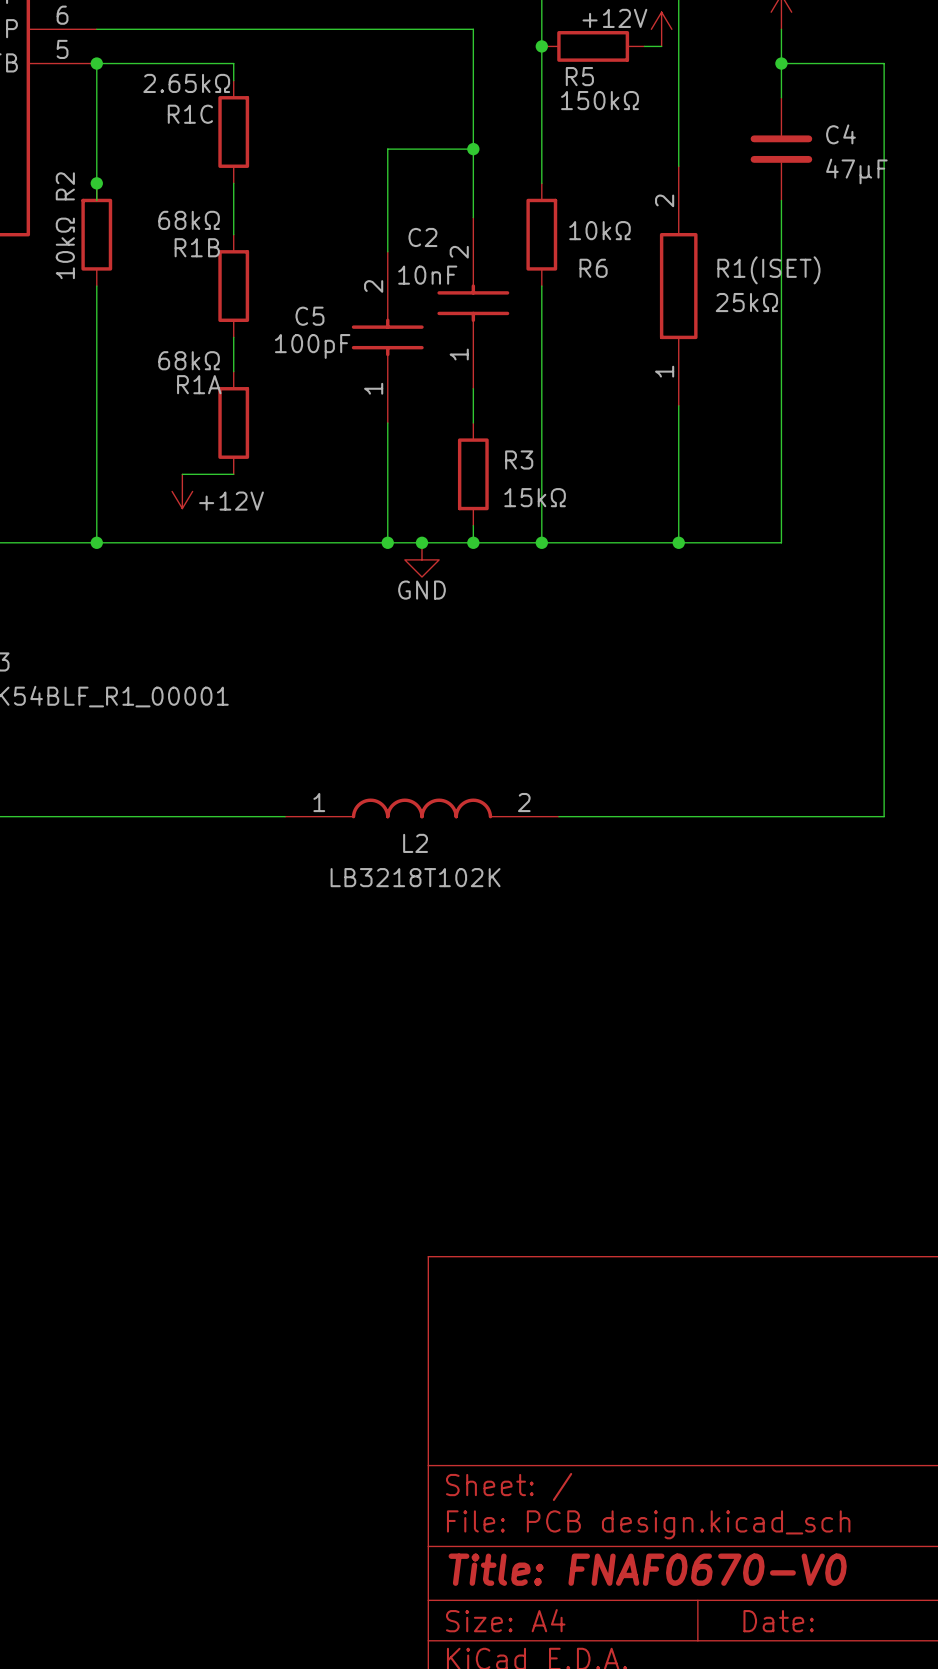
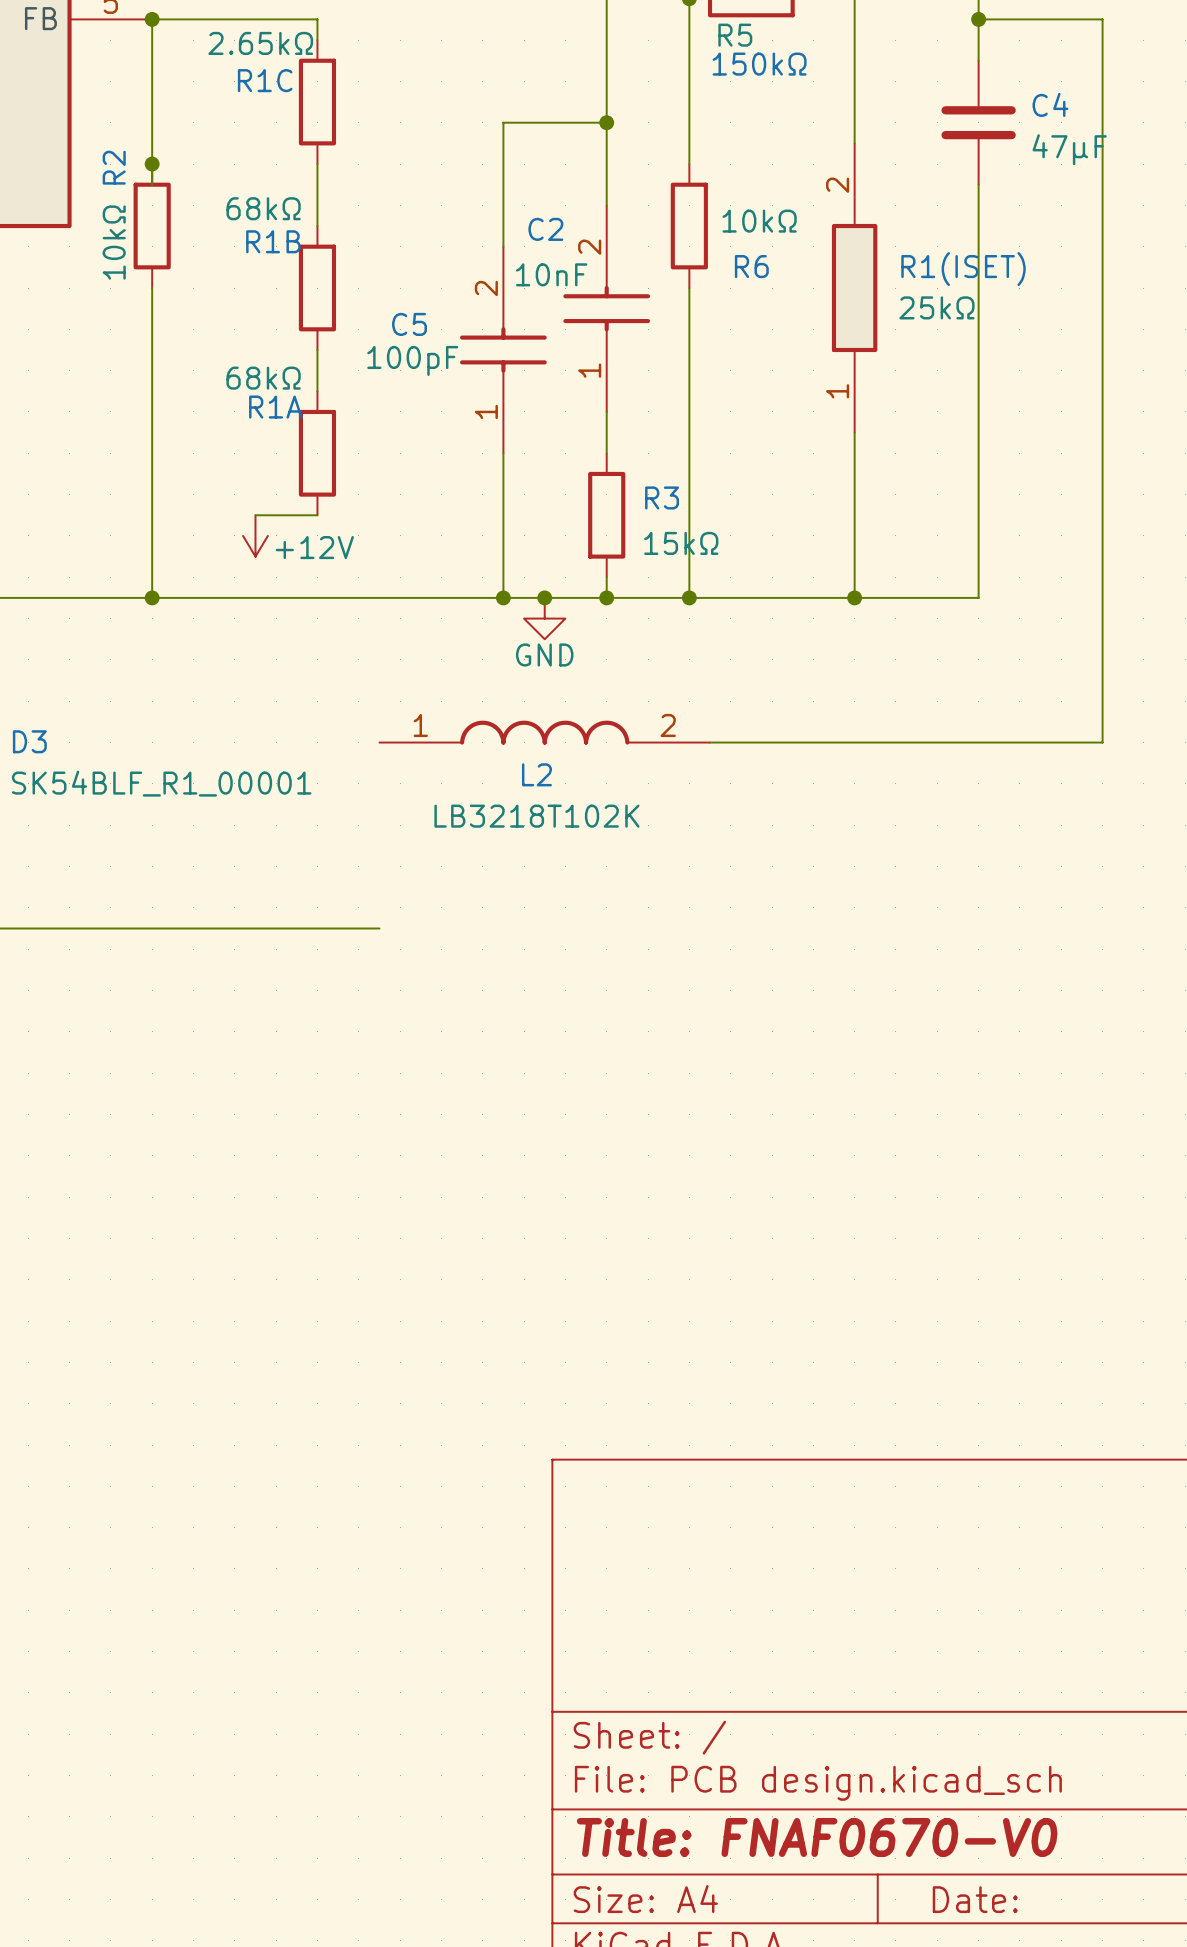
wire: (884, 662) (884, 816) (558, 816) -> (1102, 742) (710, 742)
L2 position: (421, 808) -> (544, 732)

